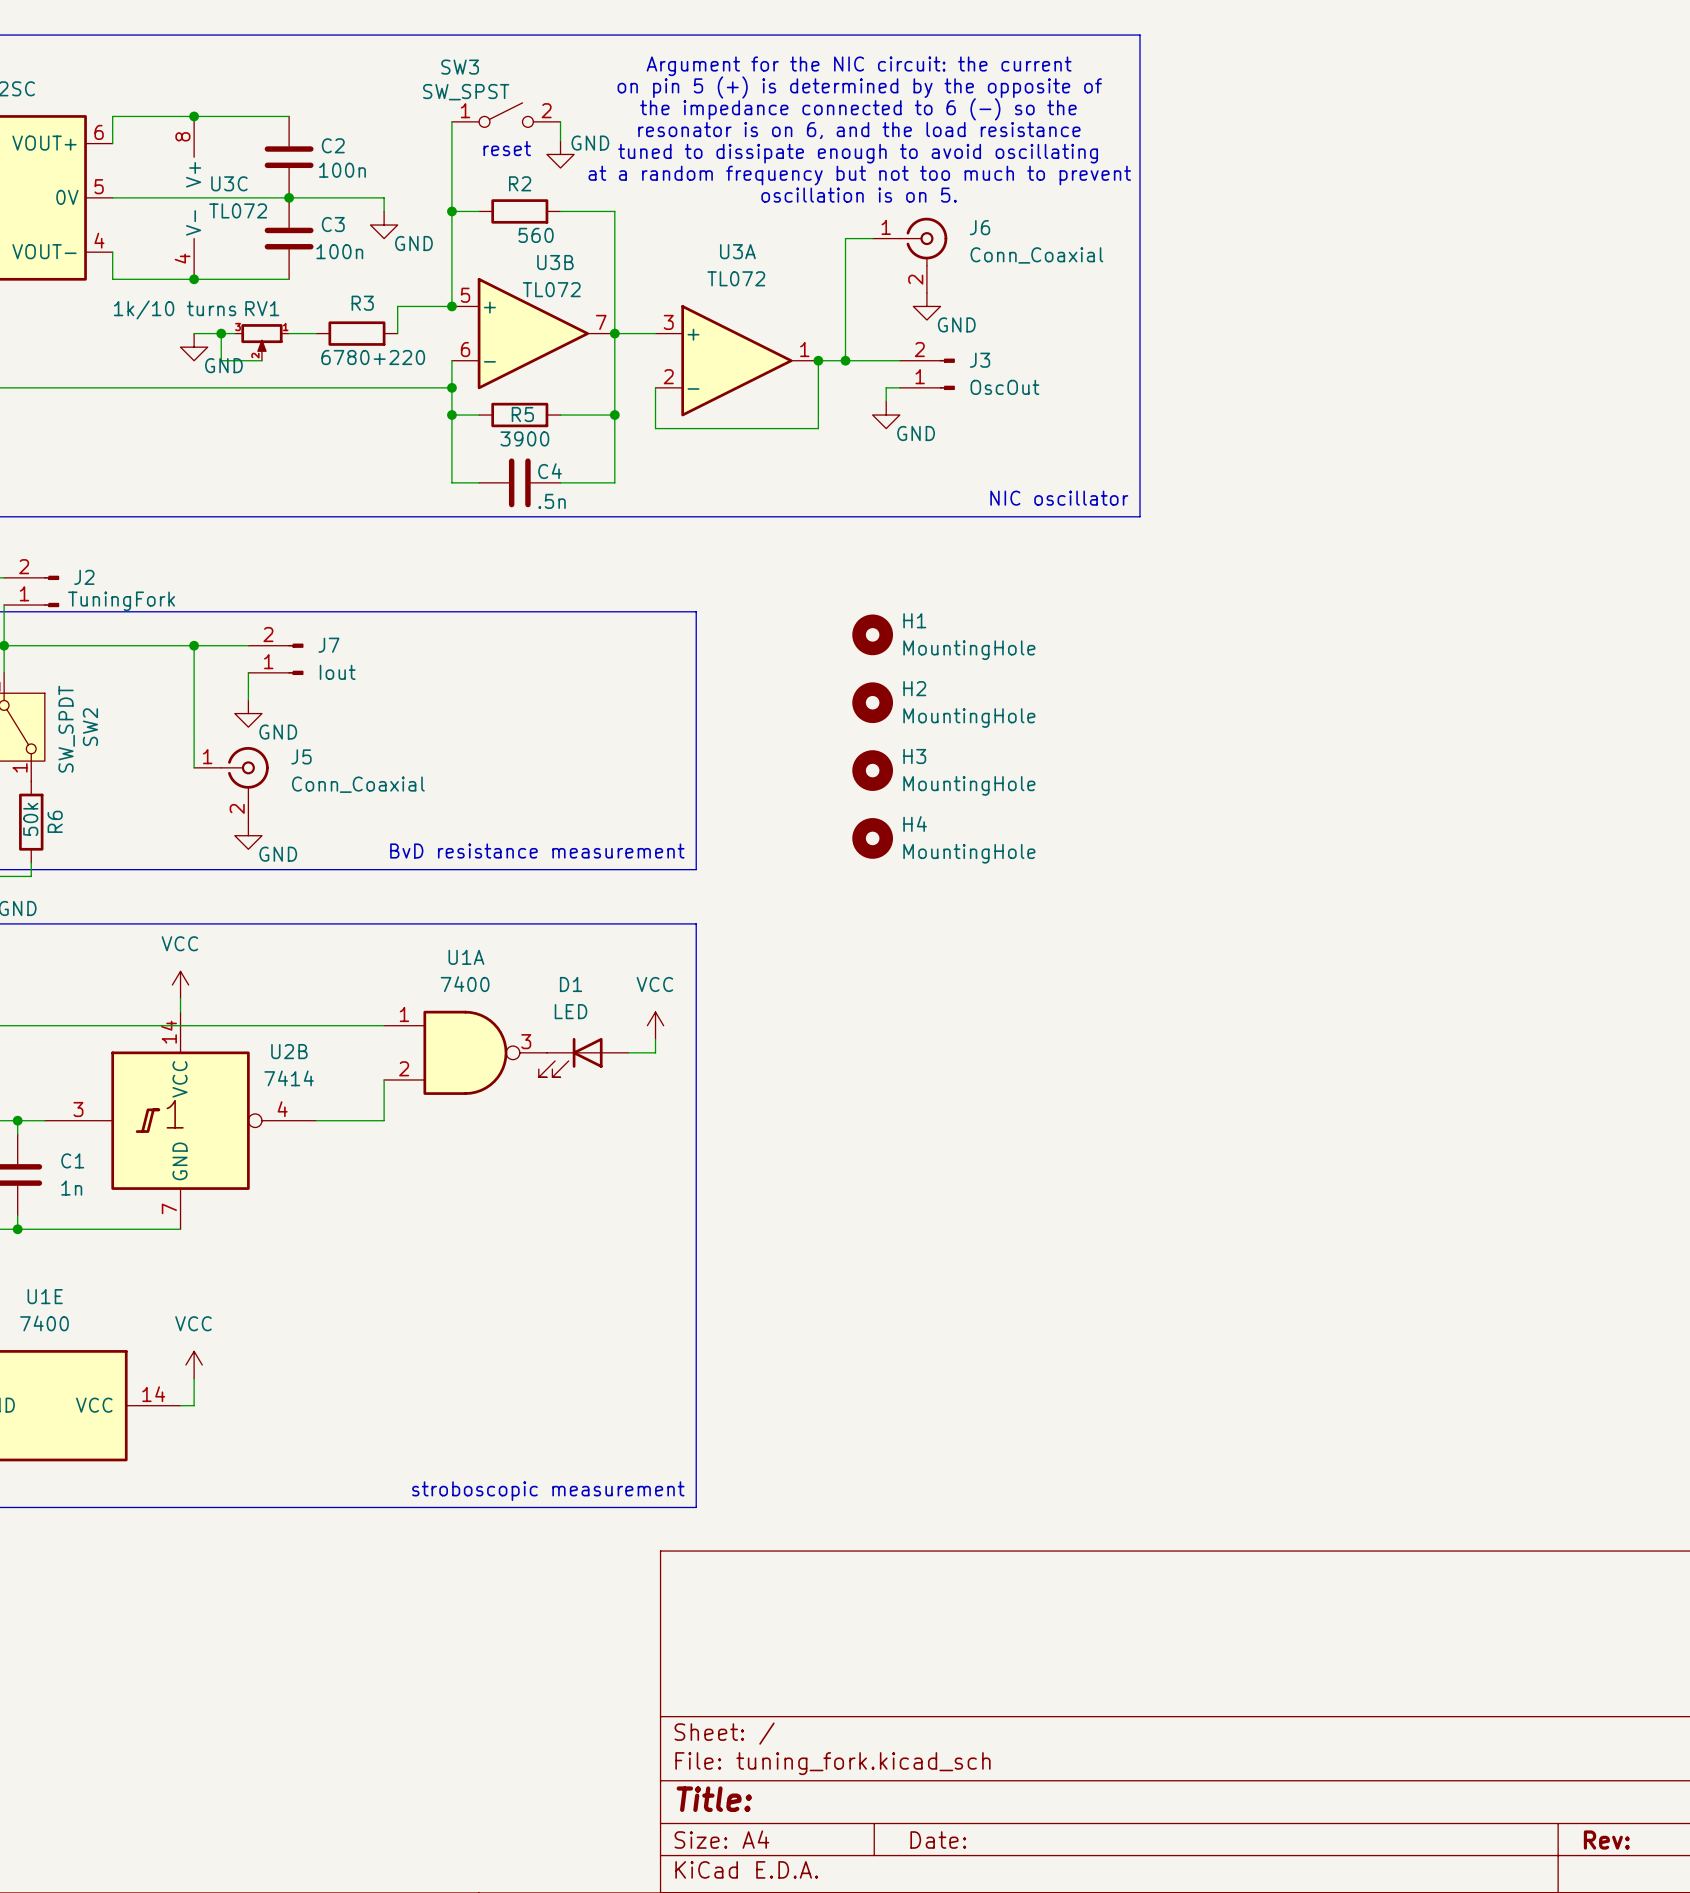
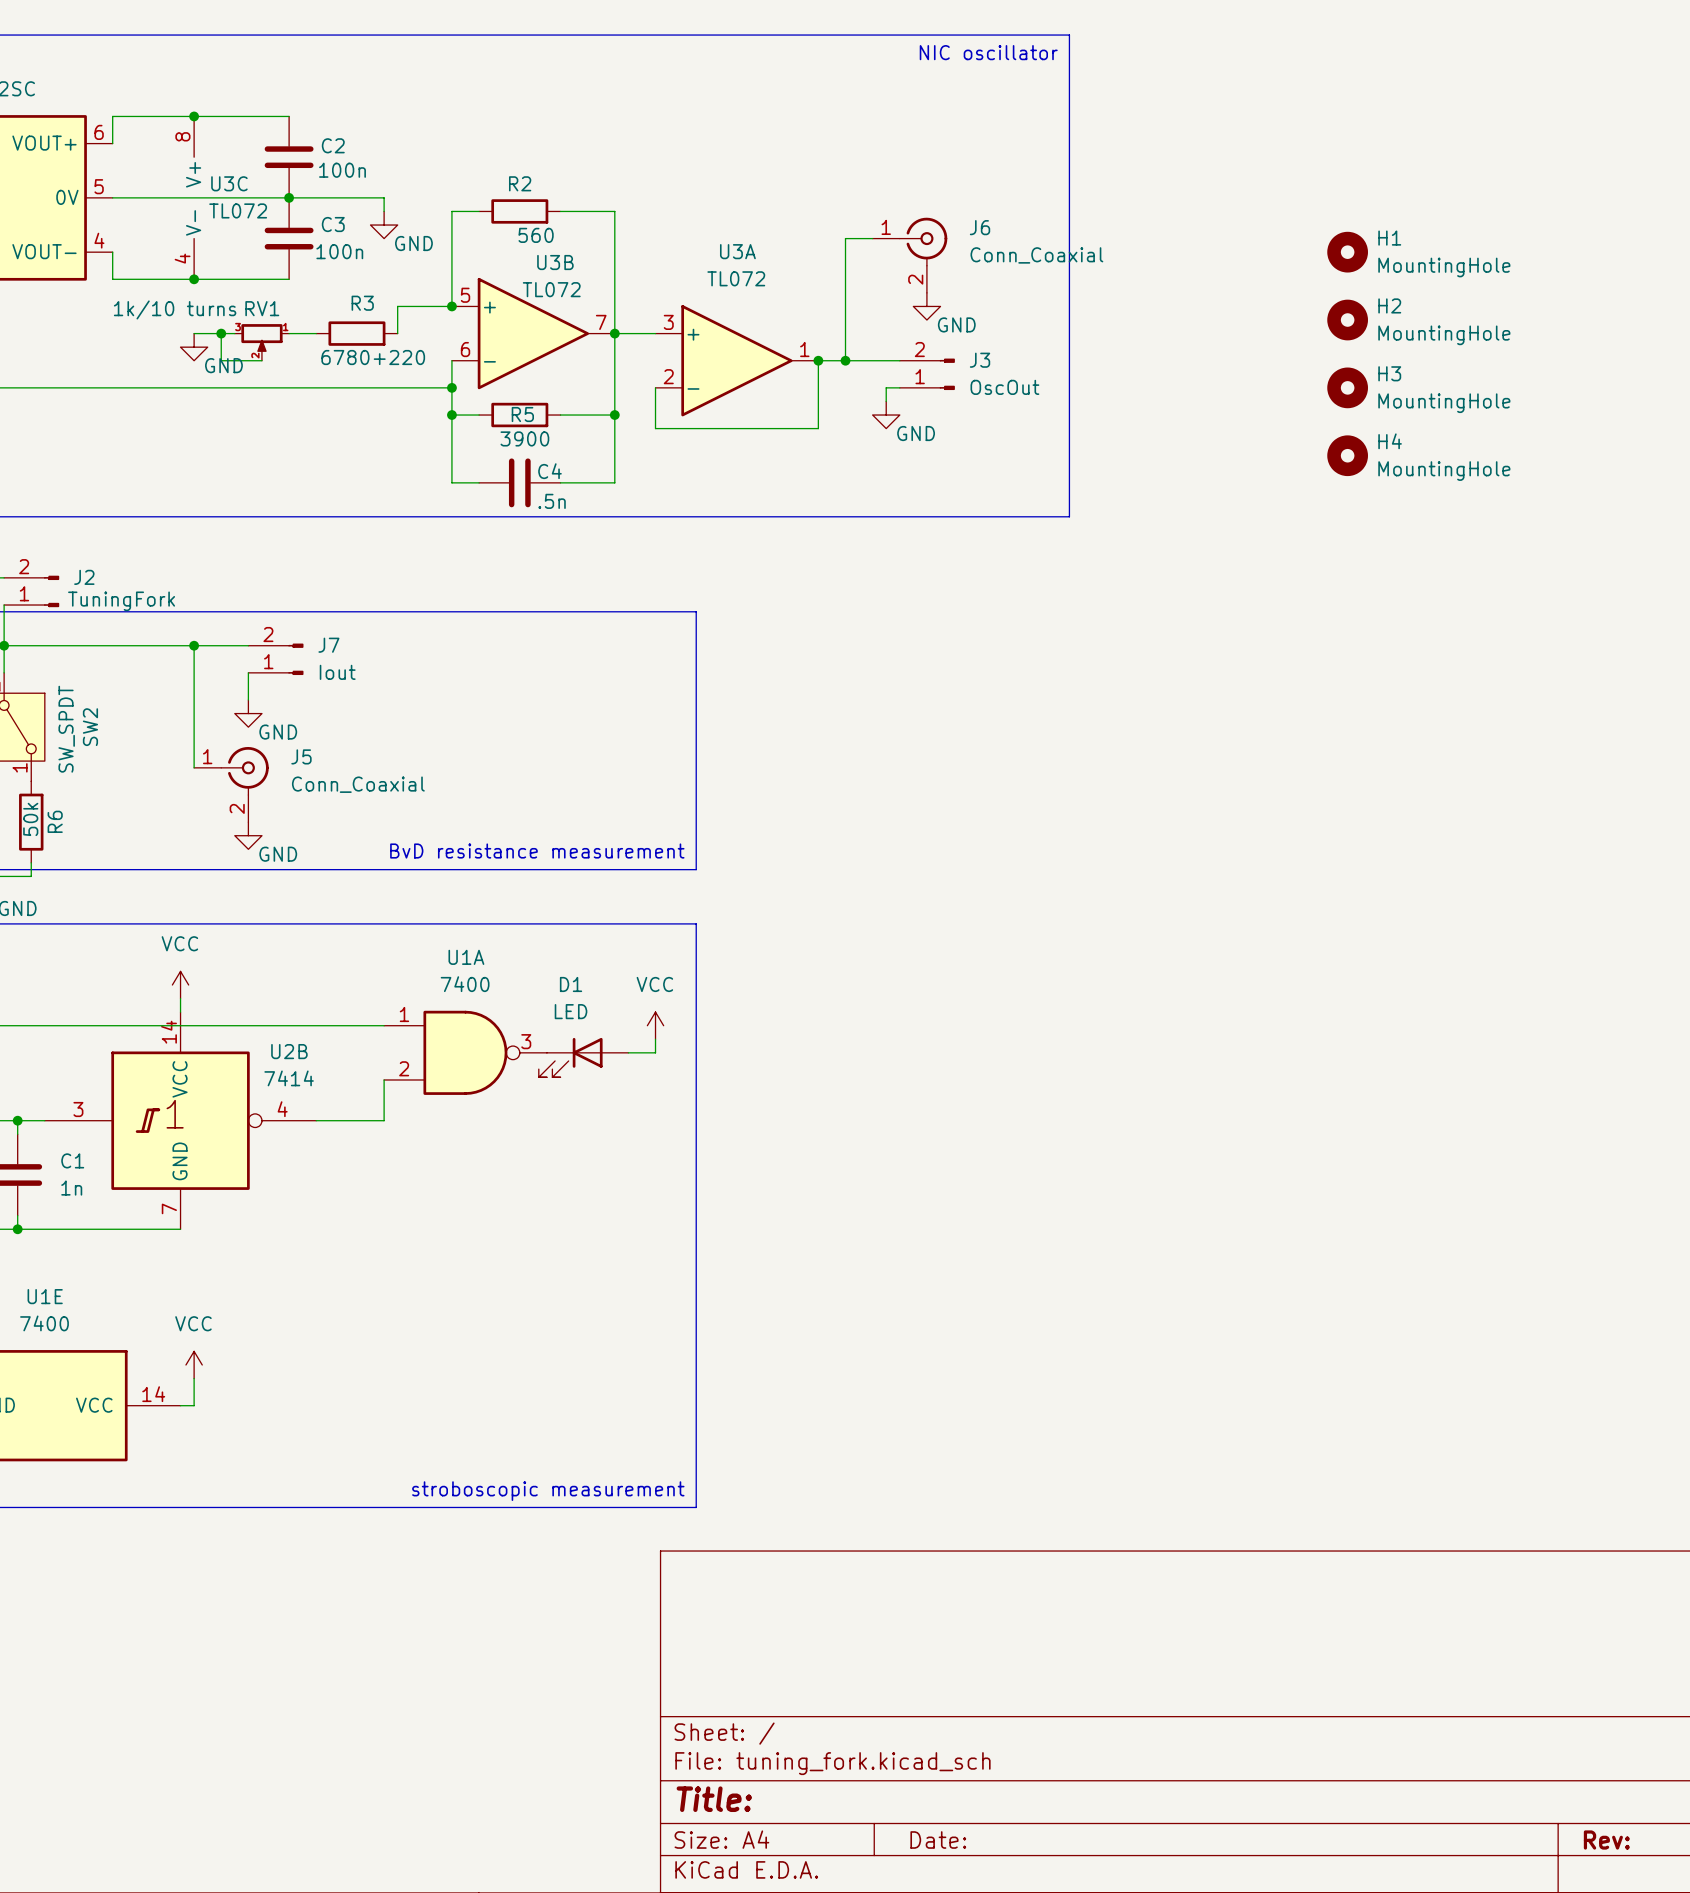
line: (1069, 35) (1139, 35) (1139, 516) (1069, 516) -> (1069, 35) (1069, 516)
text: none -> NIC oscillator (988, 52)
text: Argument for the NIC circuit: the current (859, 66) -> none
text: on pin 5 (+) is determined by the opposite of (859, 87) -> none
text: the impedance connected to 6 (-) so the (858, 109) -> none
SW3: SW_SPST (506, 115) -> none
wire: (451, 121) (451, 211) -> none
wire: (560, 121) (560, 140) -> none
text: resonator is on 6, and the load resistance (859, 130) -> none
text: reset (507, 148) -> none
text: tuned to dissipate enough to avoid oscillating (858, 153) -> none
power symbol: GND (560, 154) -> none
text: at a random frequency but not too much to prevent (859, 175) -> none
text: oscillation is on 5. (859, 195) -> none
junction: (451, 211) -> none
text: NIC oscillator (1059, 498) -> none
H1 position: (872, 634) -> (1347, 252)
H2 position: (872, 702) -> (1347, 320)
H3 position: (872, 770) -> (1347, 387)
H4 position: (872, 838) -> (1347, 455)

